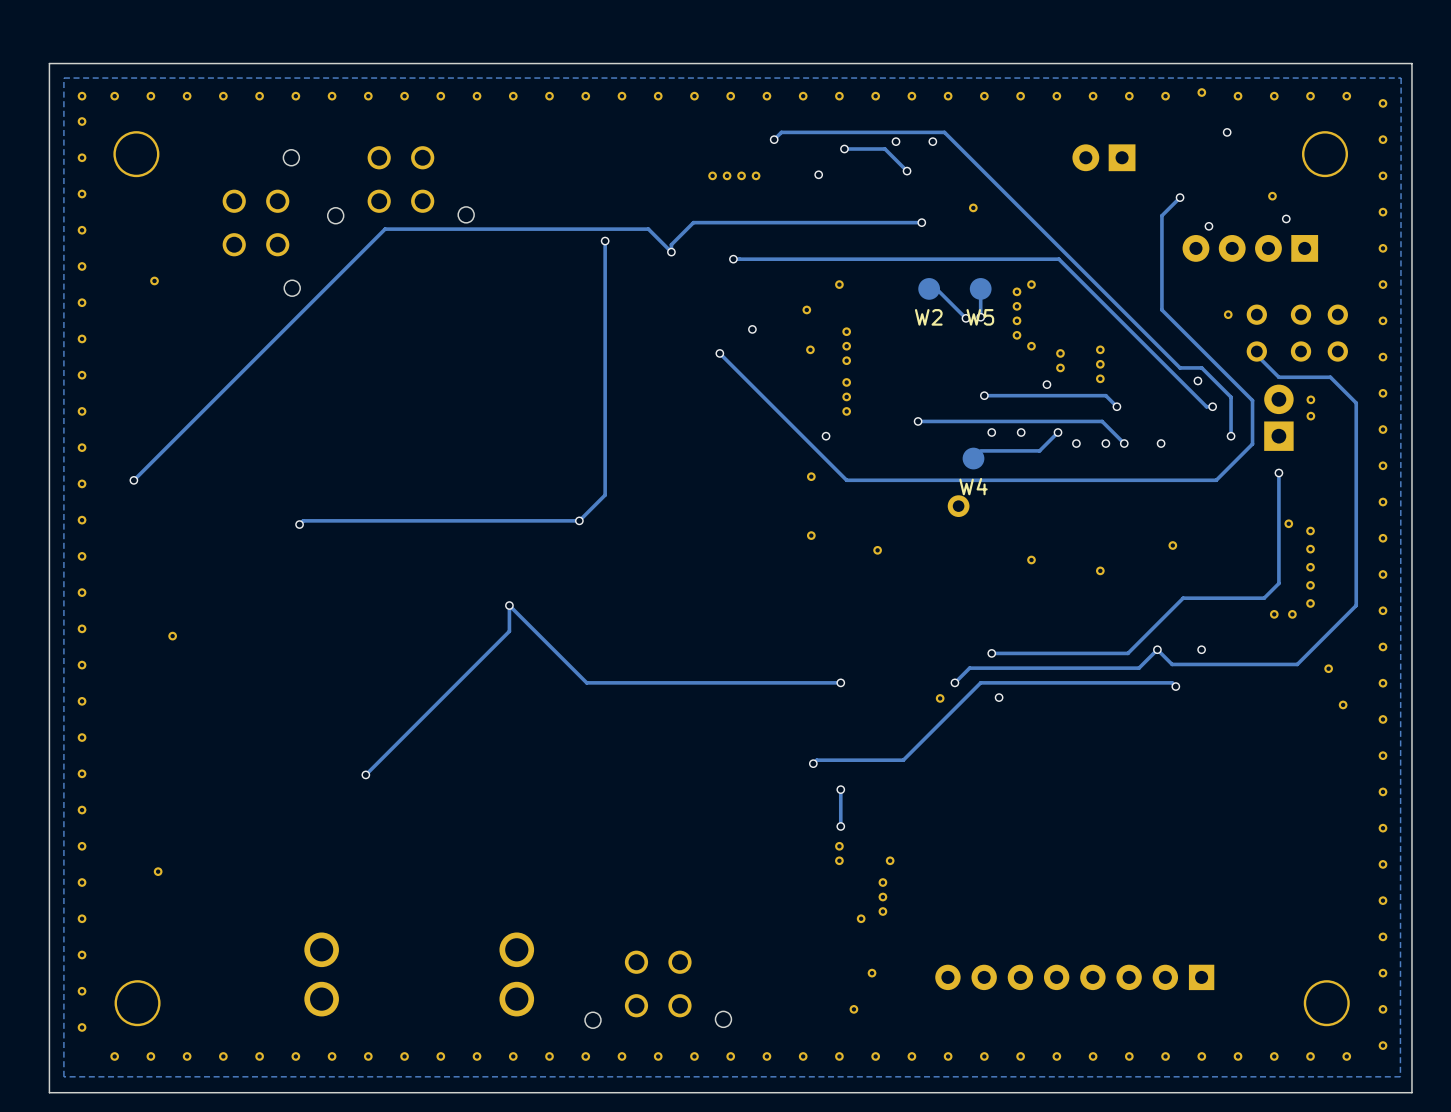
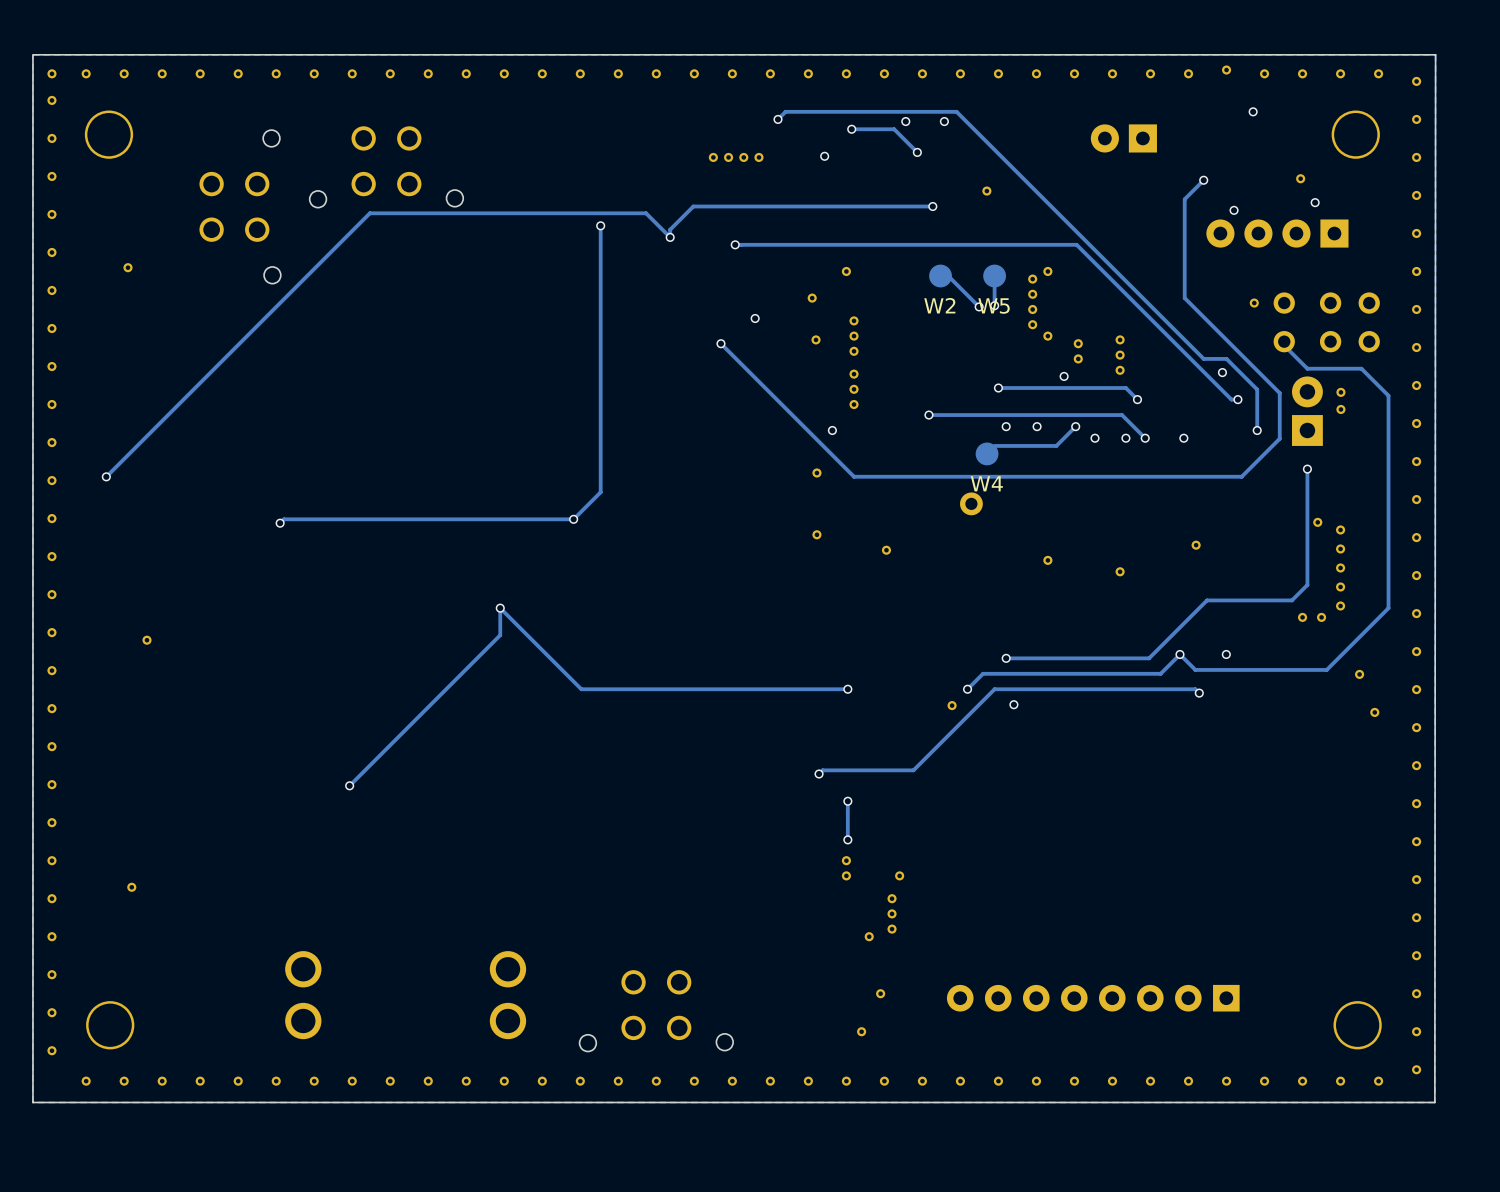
board edge: (1411, 63) (49, 63) (49, 1092) (1411, 1092) (1411, 63) -> none
board edge: none -> (33, 54) (1435, 54) (1434, 1102) (32, 1102) (32, 54)

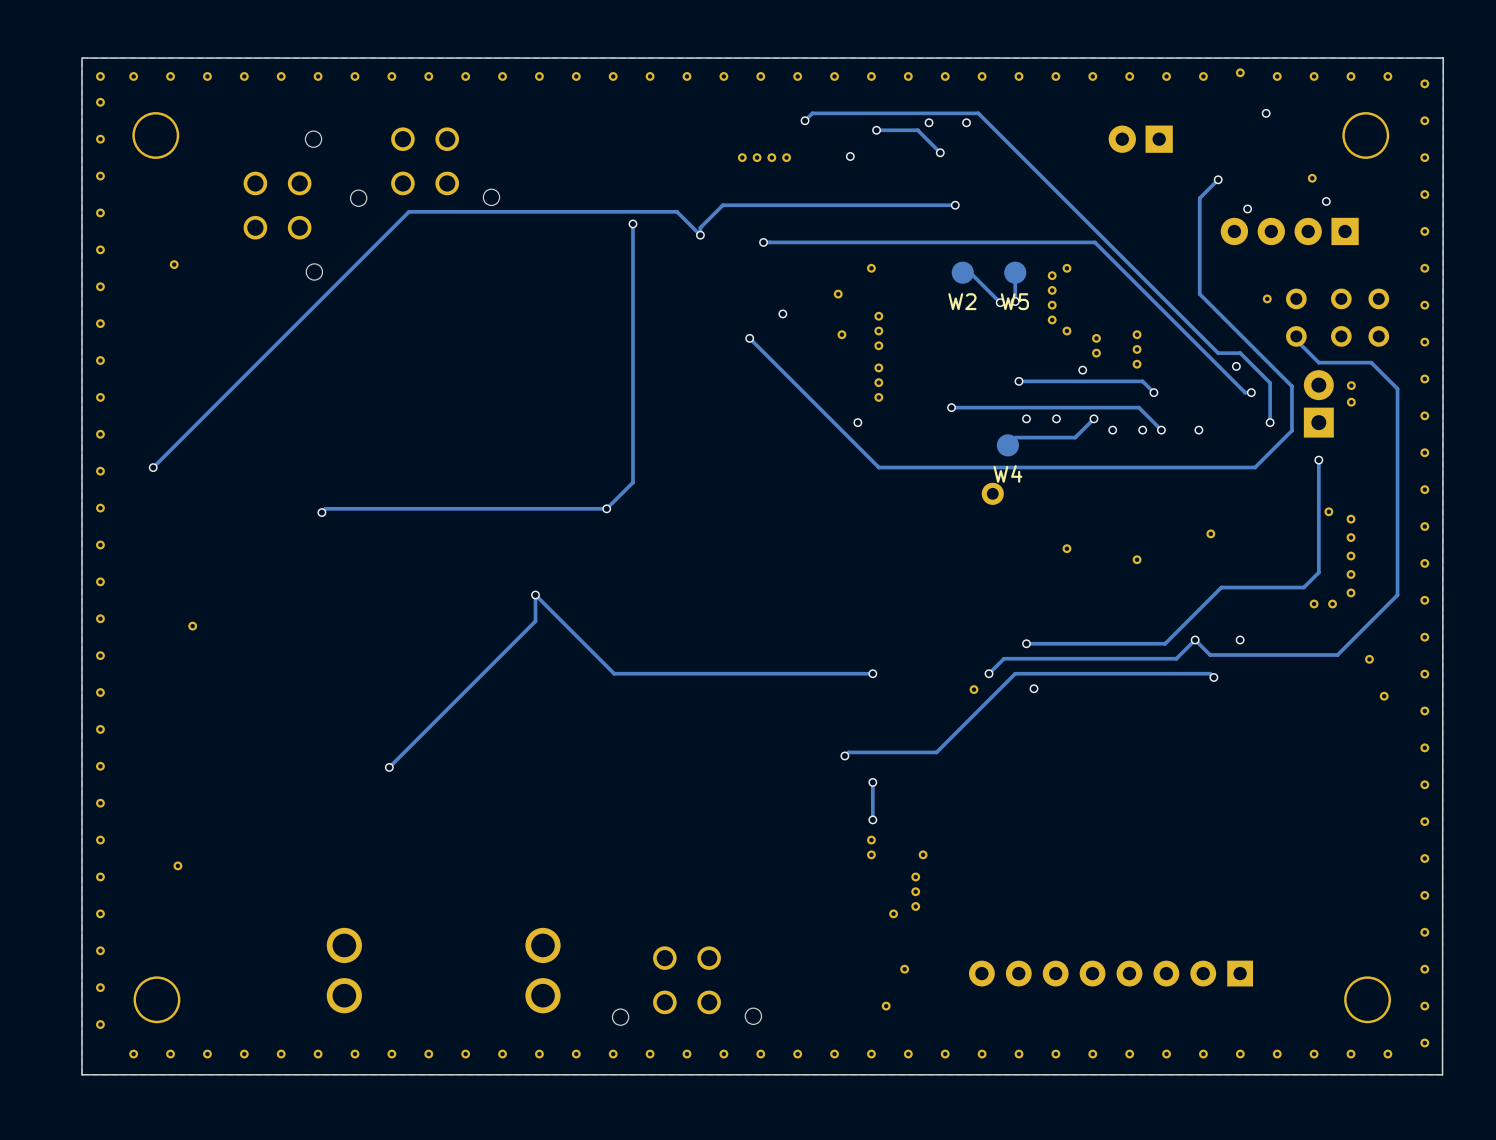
part: (986, 191) -> none
part: (816, 472) -> none
part: (816, 534) -> none
part: (886, 550) -> none

